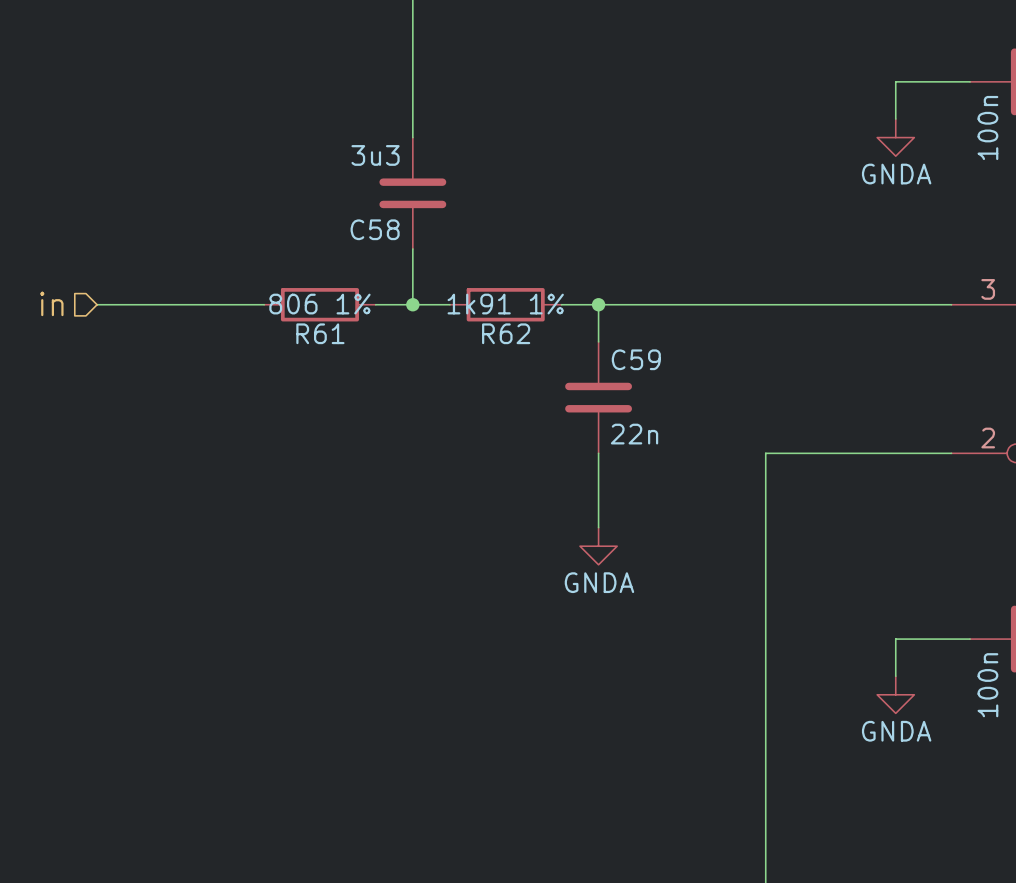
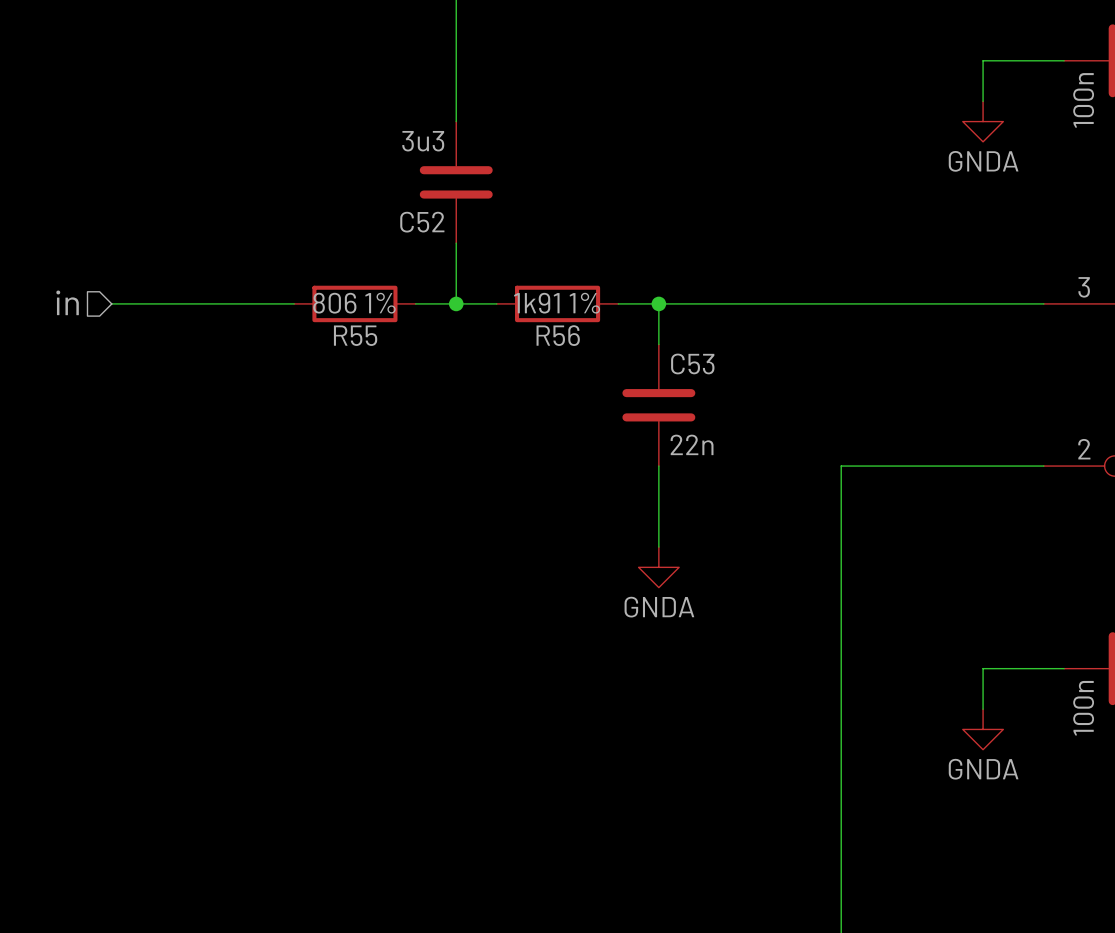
C58 name: C58 (375, 229) -> C52 (422, 222)
R61 name: R61 (320, 333) -> R55 (355, 335)
R62 name: R62 (506, 333) -> R56 (558, 335)
C59 name: C59 (636, 359) -> C53 (692, 363)

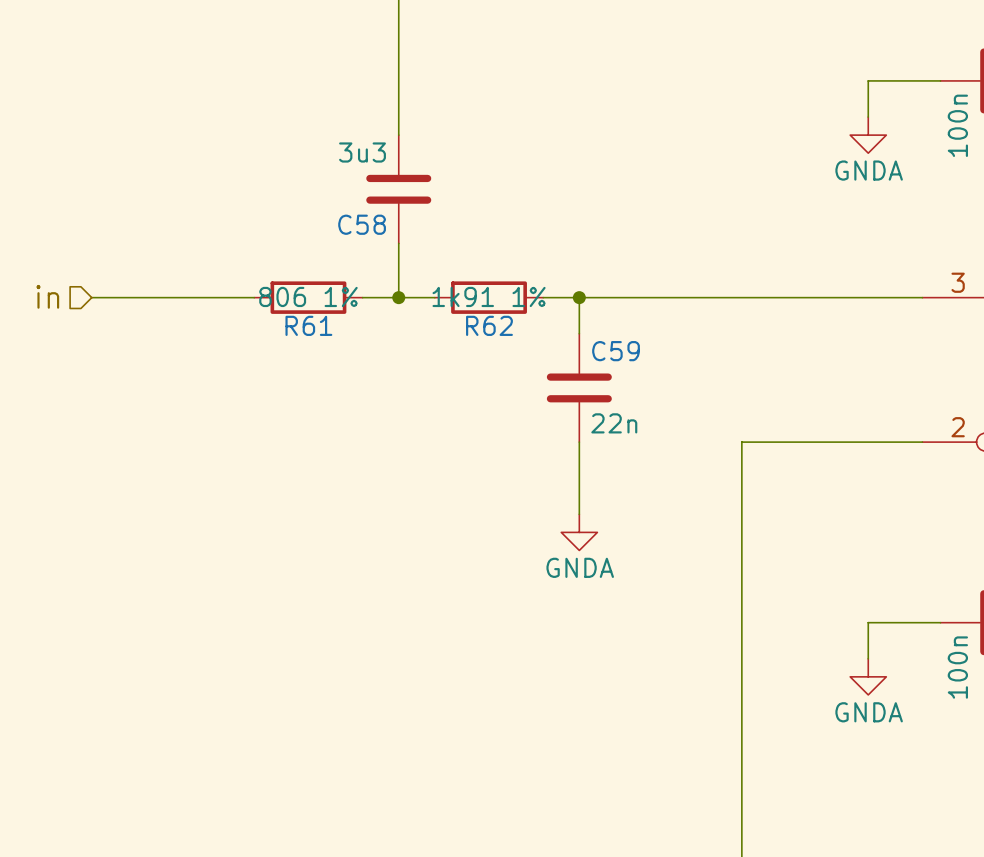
C52 name: C52 (422, 222) -> C58 (362, 224)
R55 name: R55 (355, 335) -> R61 (308, 325)
R56 name: R56 (558, 335) -> R62 (489, 325)
C53 name: C53 (692, 363) -> C59 (616, 351)

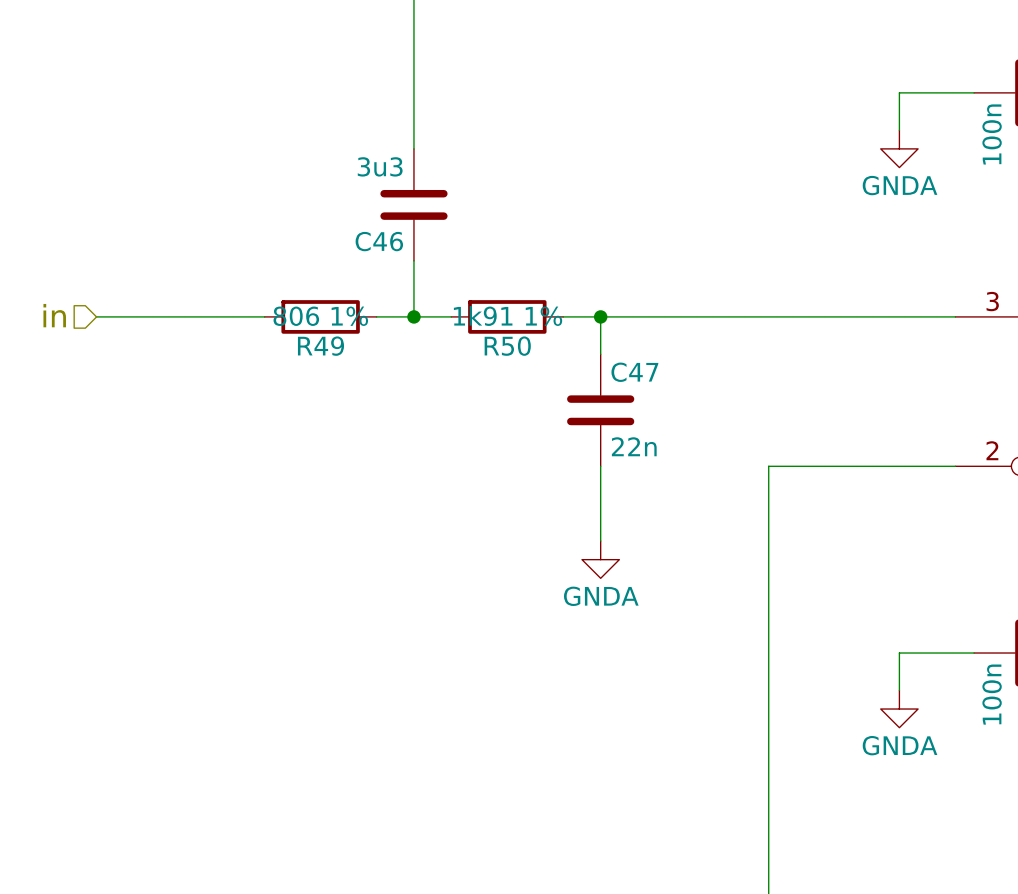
C58 name: C58 (362, 224) -> C46 (379, 241)
R61 name: R61 (308, 325) -> R49 (320, 346)
R62 name: R62 (489, 325) -> R50 (507, 346)
C59 name: C59 (616, 351) -> C47 (634, 372)

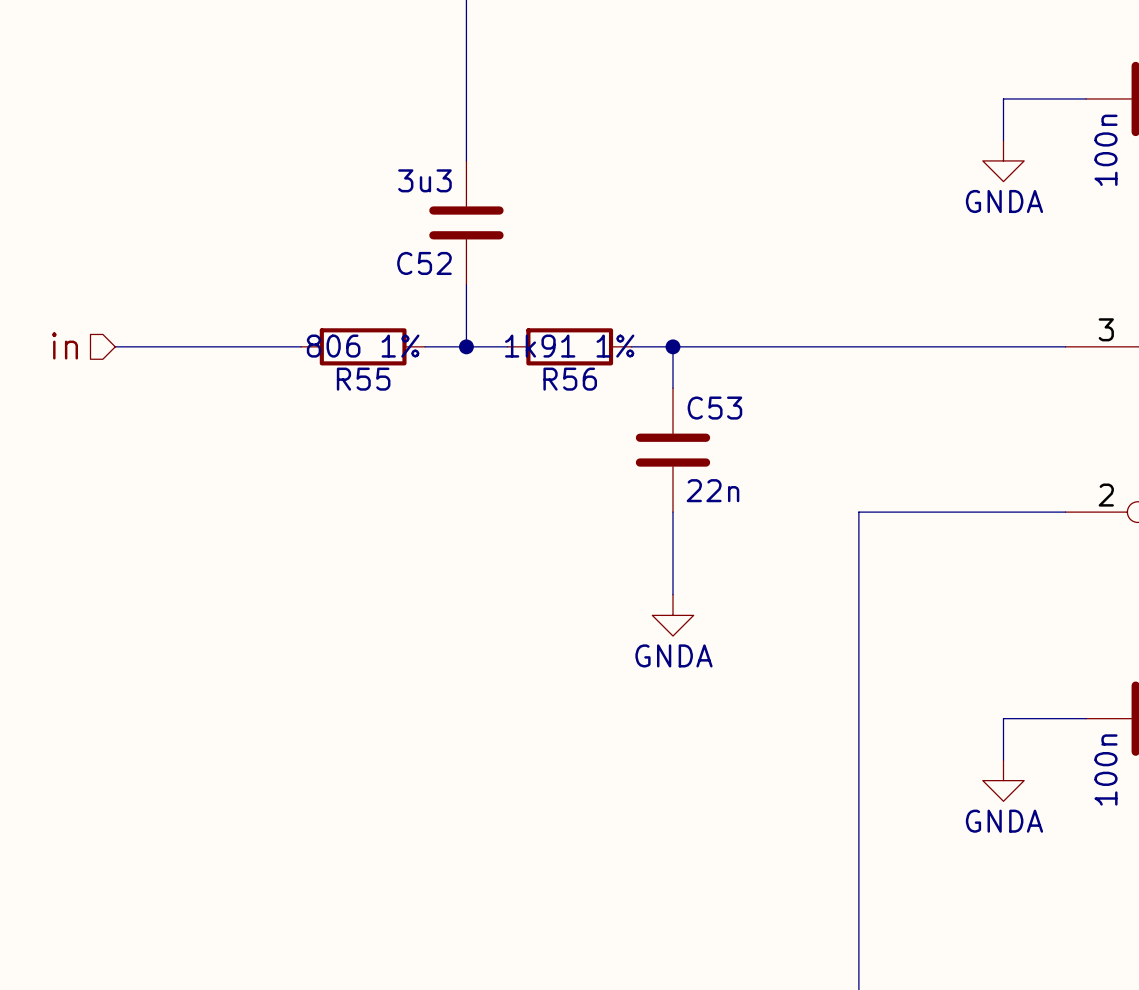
C46 name: C46 (379, 241) -> C52 (424, 263)
R49 name: R49 (320, 346) -> R55 (363, 379)
R50 name: R50 (507, 346) -> R56 (570, 379)
C47 name: C47 (634, 372) -> C53 (714, 408)

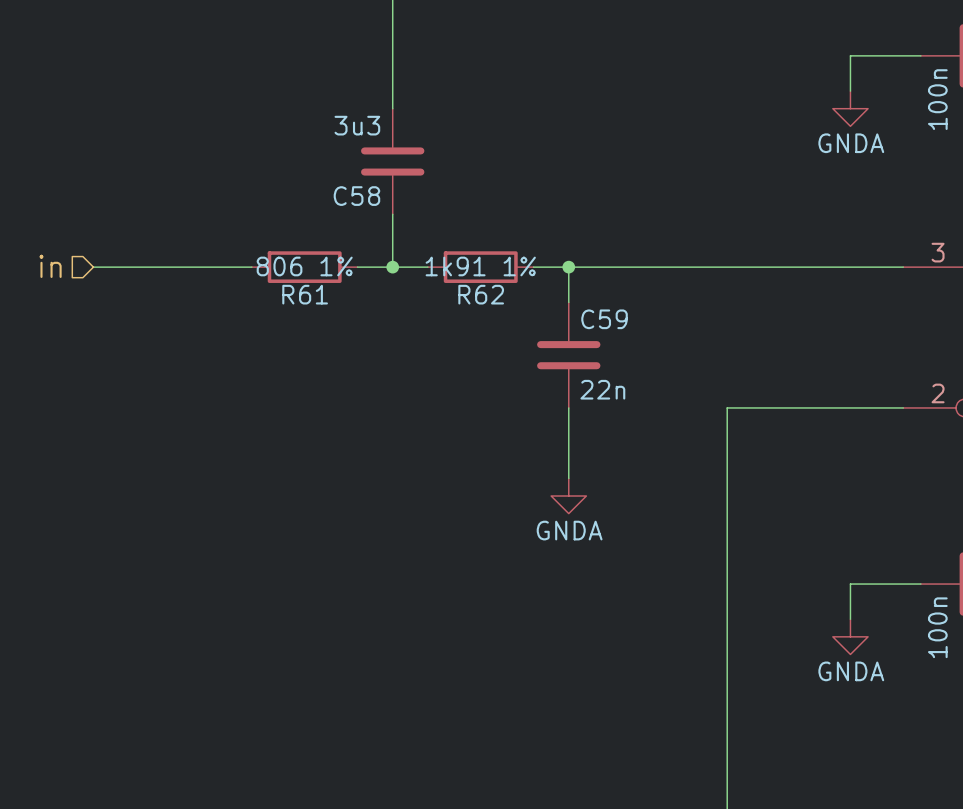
C52 name: C52 (424, 263) -> C58 (356, 196)
R55 name: R55 (363, 379) -> R61 (305, 294)
R56 name: R56 (570, 379) -> R62 (481, 294)
C53 name: C53 (714, 408) -> C59 (604, 319)

